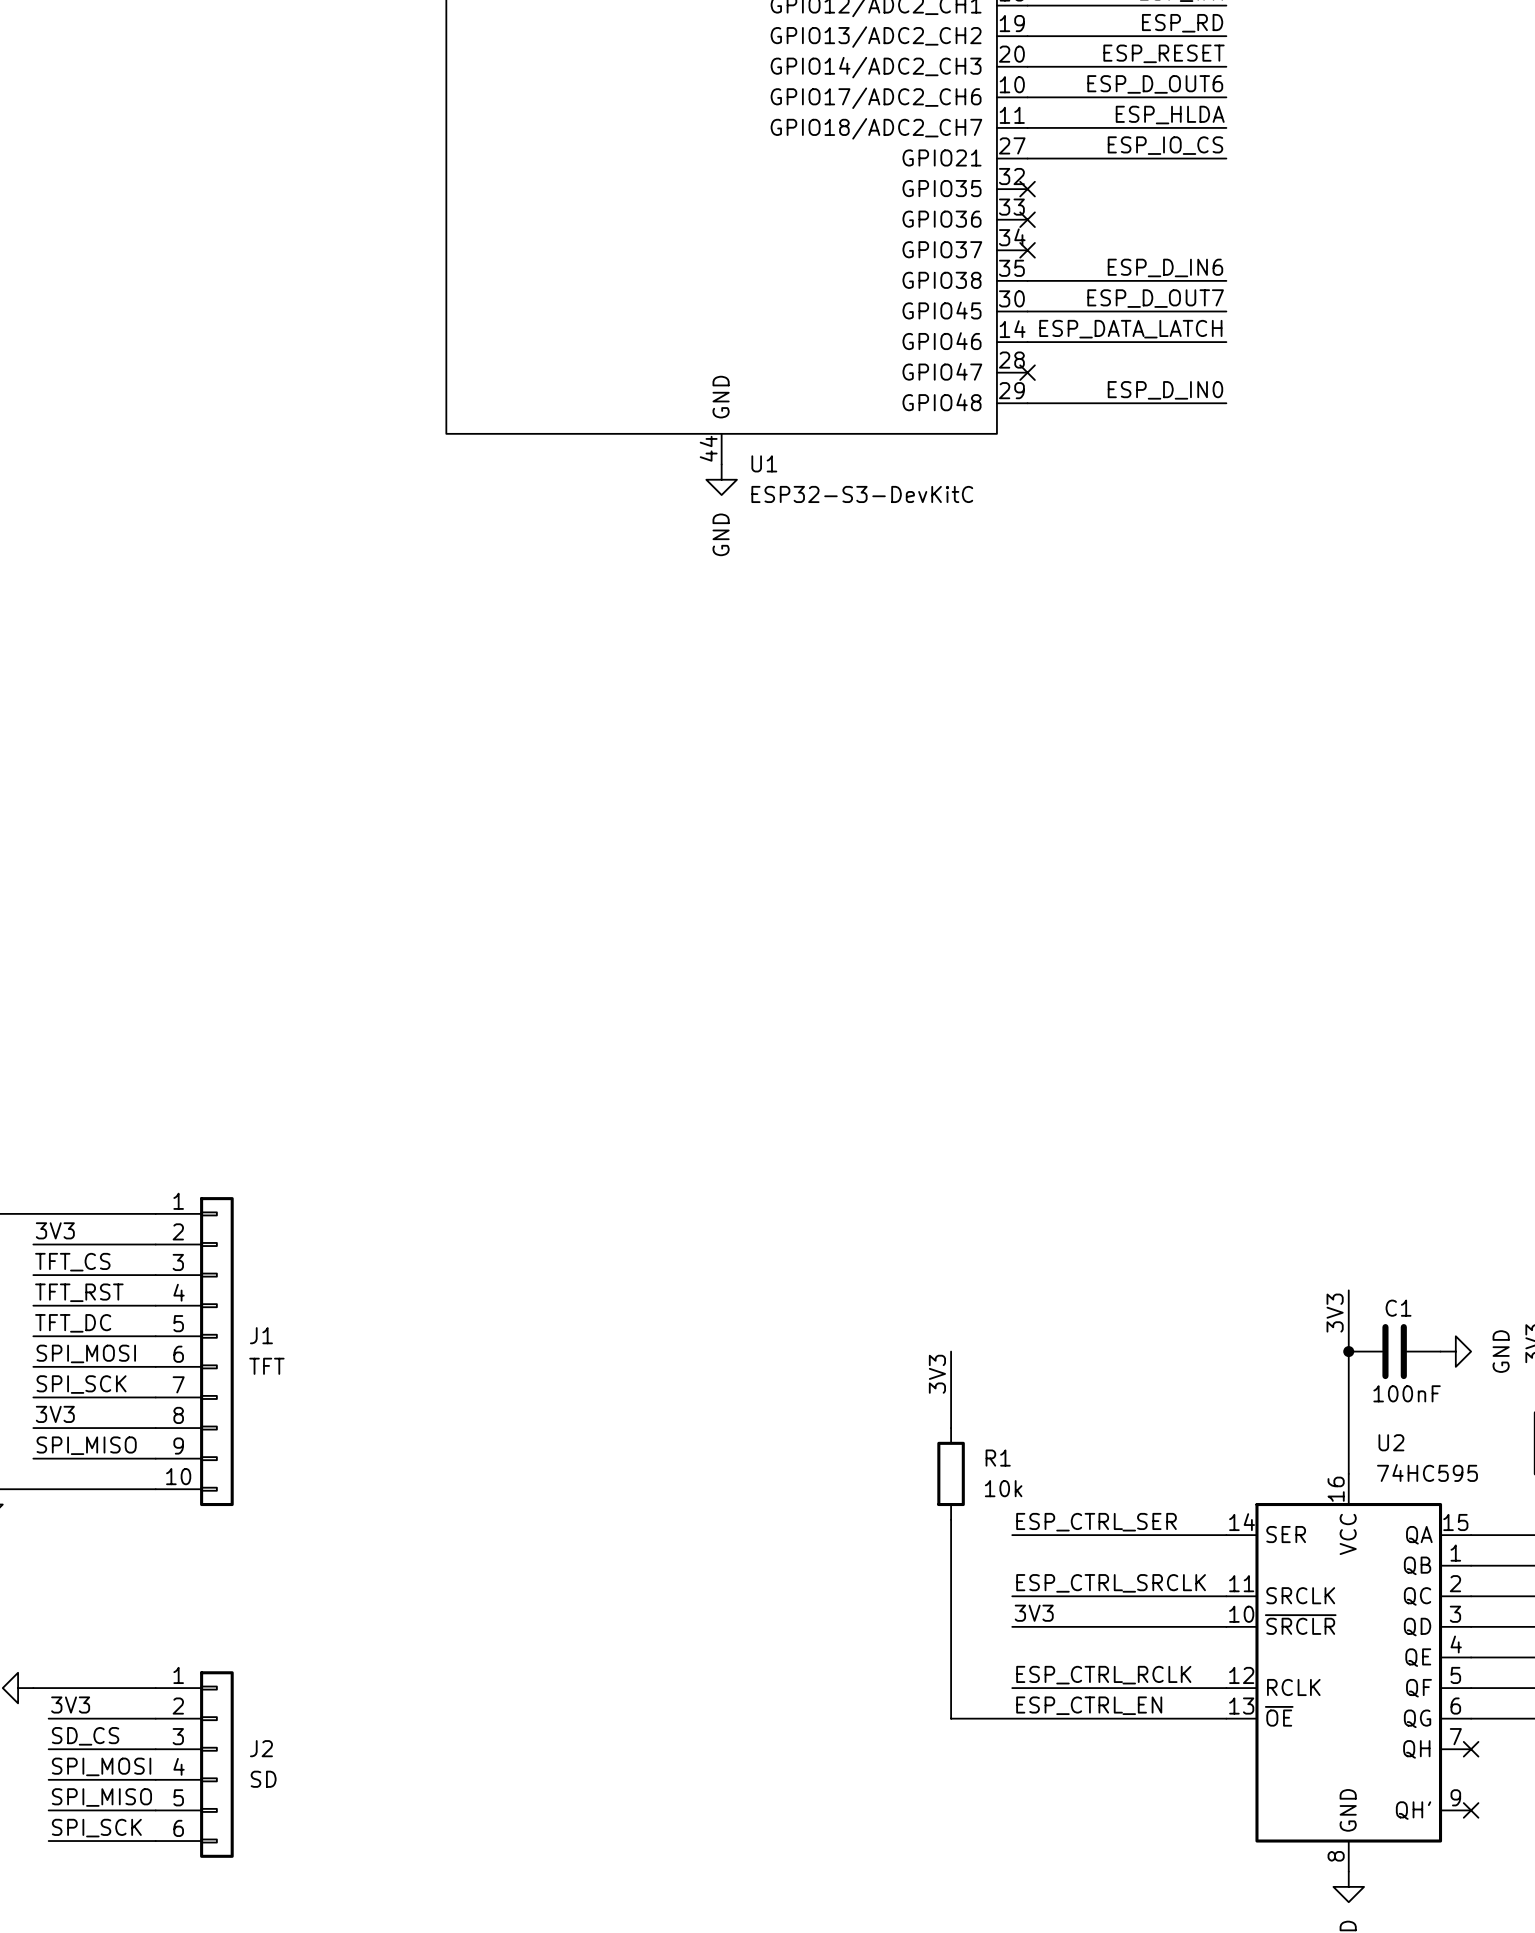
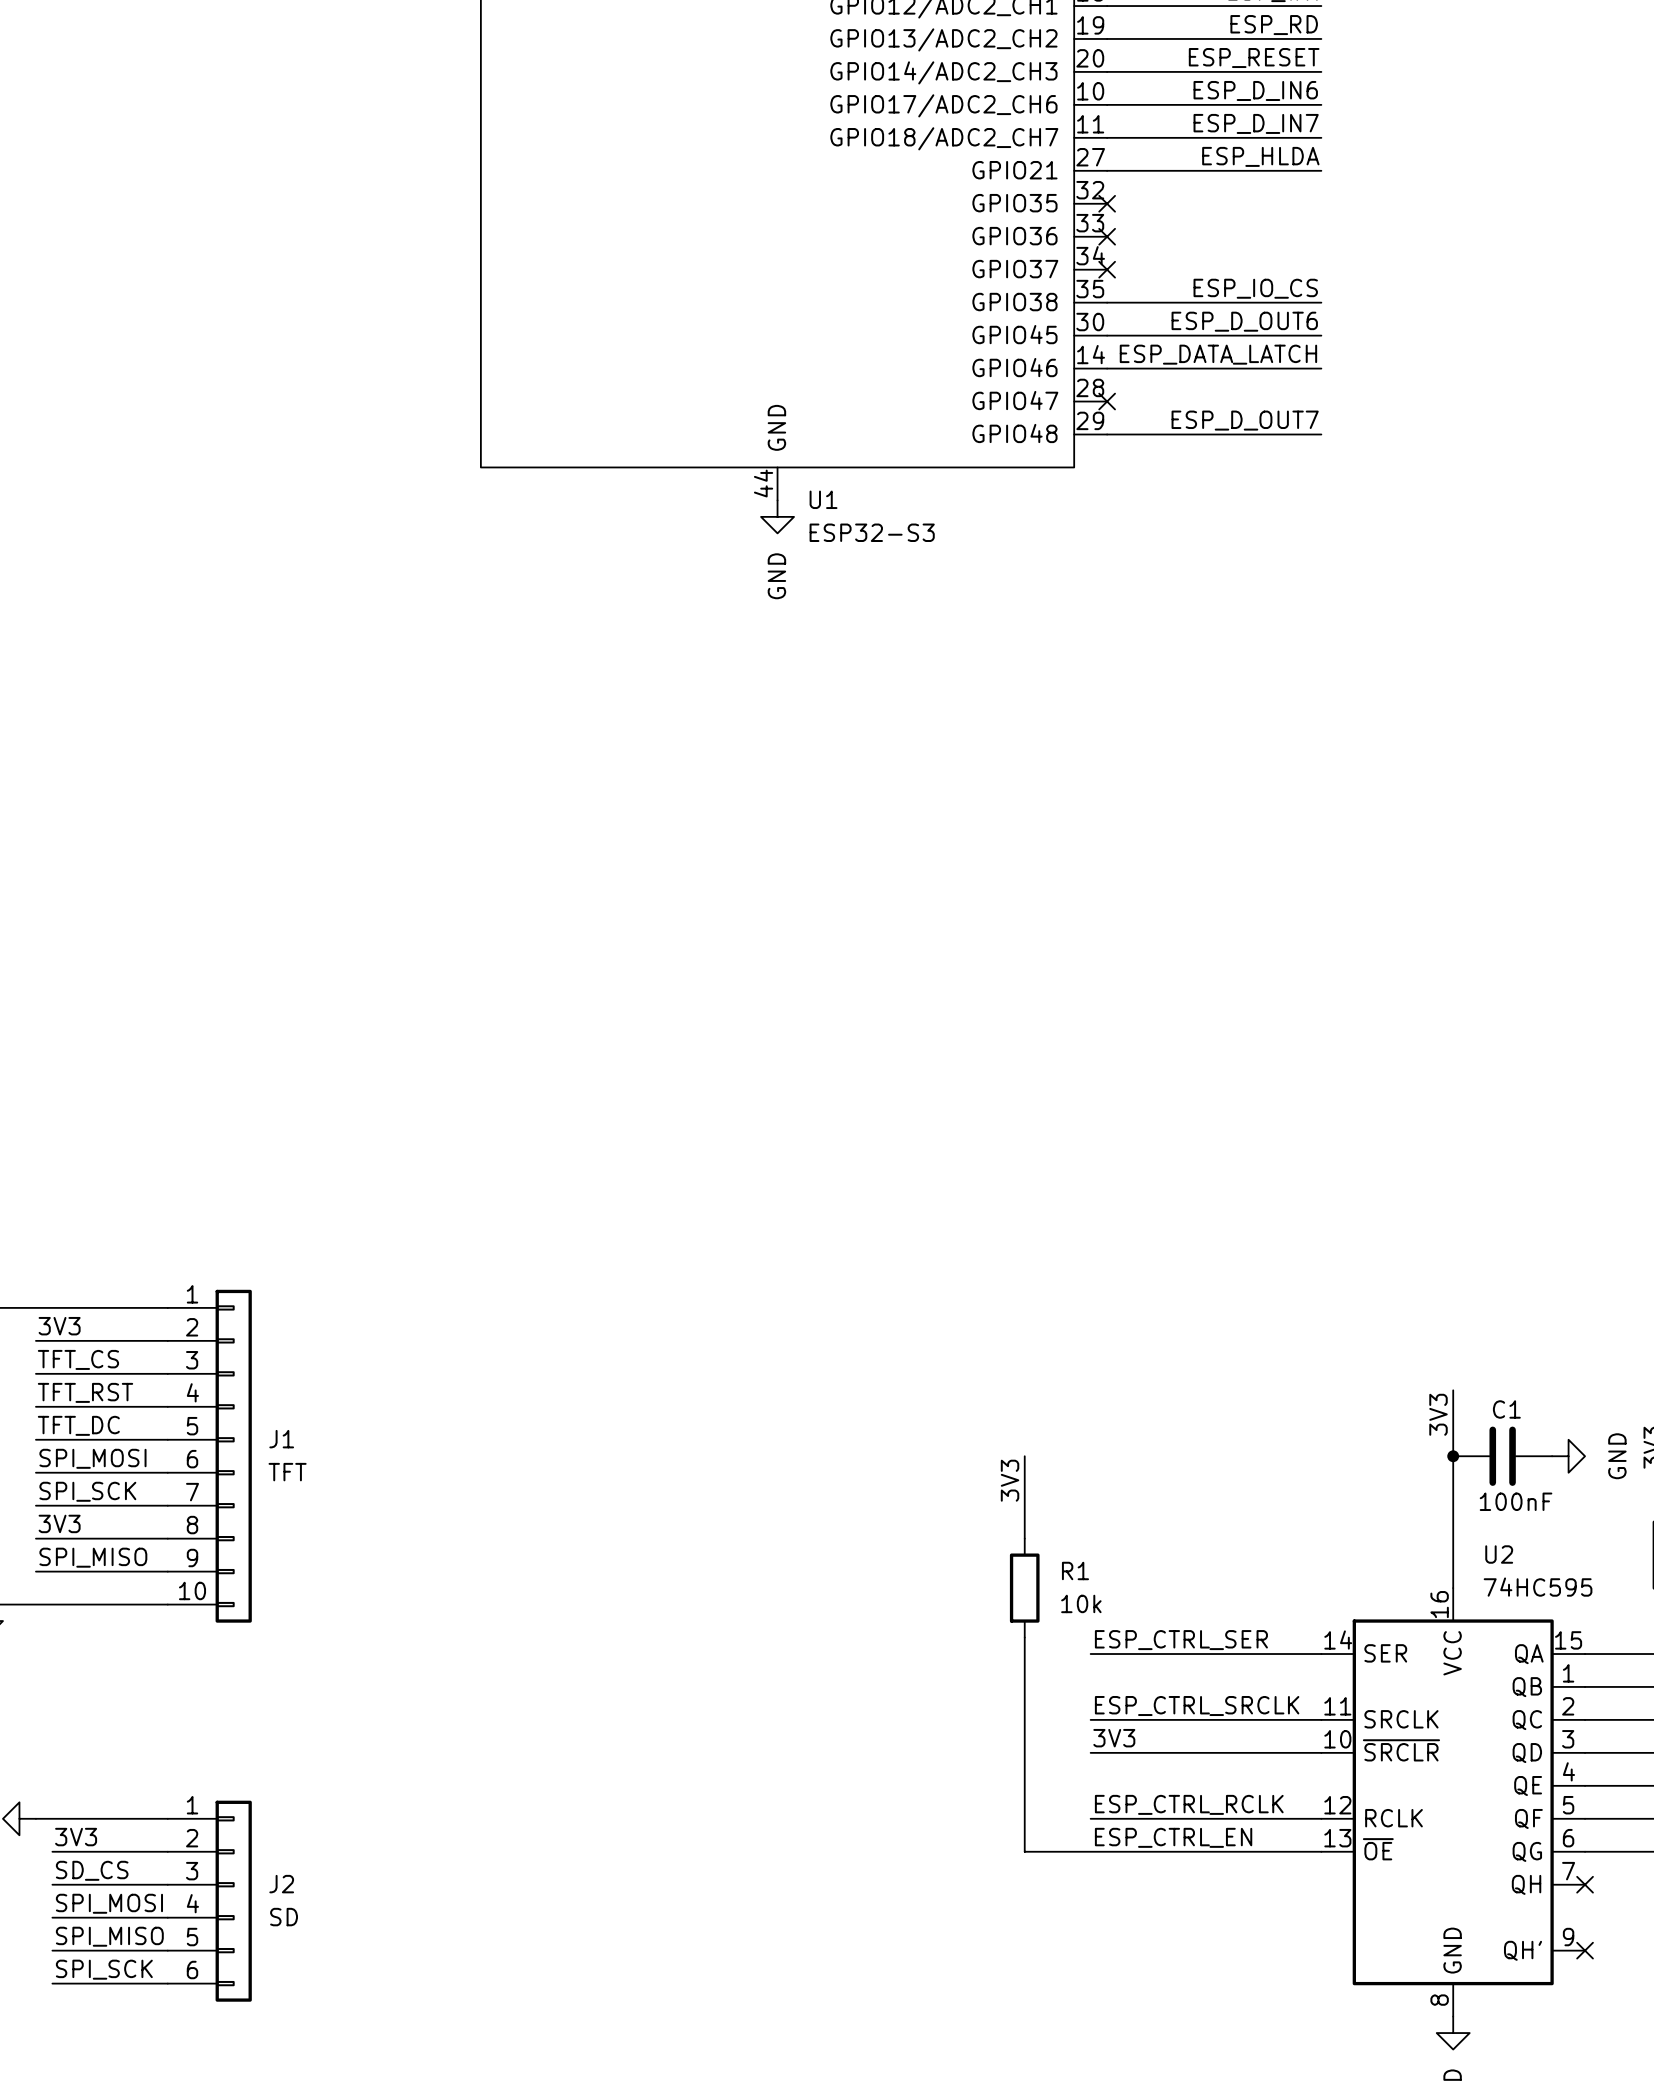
label: ESP_D_OUT6 (1155, 84) -> ESP_D_IN6 (1255, 90)
label: ESP_HLDA (1170, 115) -> ESP_D_IN7 (1256, 123)
label: ESP_IO_CS (1165, 145) -> ESP_HLDA (1260, 156)
label: ESP_D_IN6 (1165, 267) -> ESP_IO_CS (1255, 288)
label: ESP_D_OUT7 (1155, 298) -> ESP_D_OUT6 (1244, 321)
label: ESP_D_IN0 (1165, 390) -> ESP_D_OUT7 (1245, 420)
U1 value: ESP32-S3-DevKitC (862, 494) -> ESP32-S3 (872, 532)

